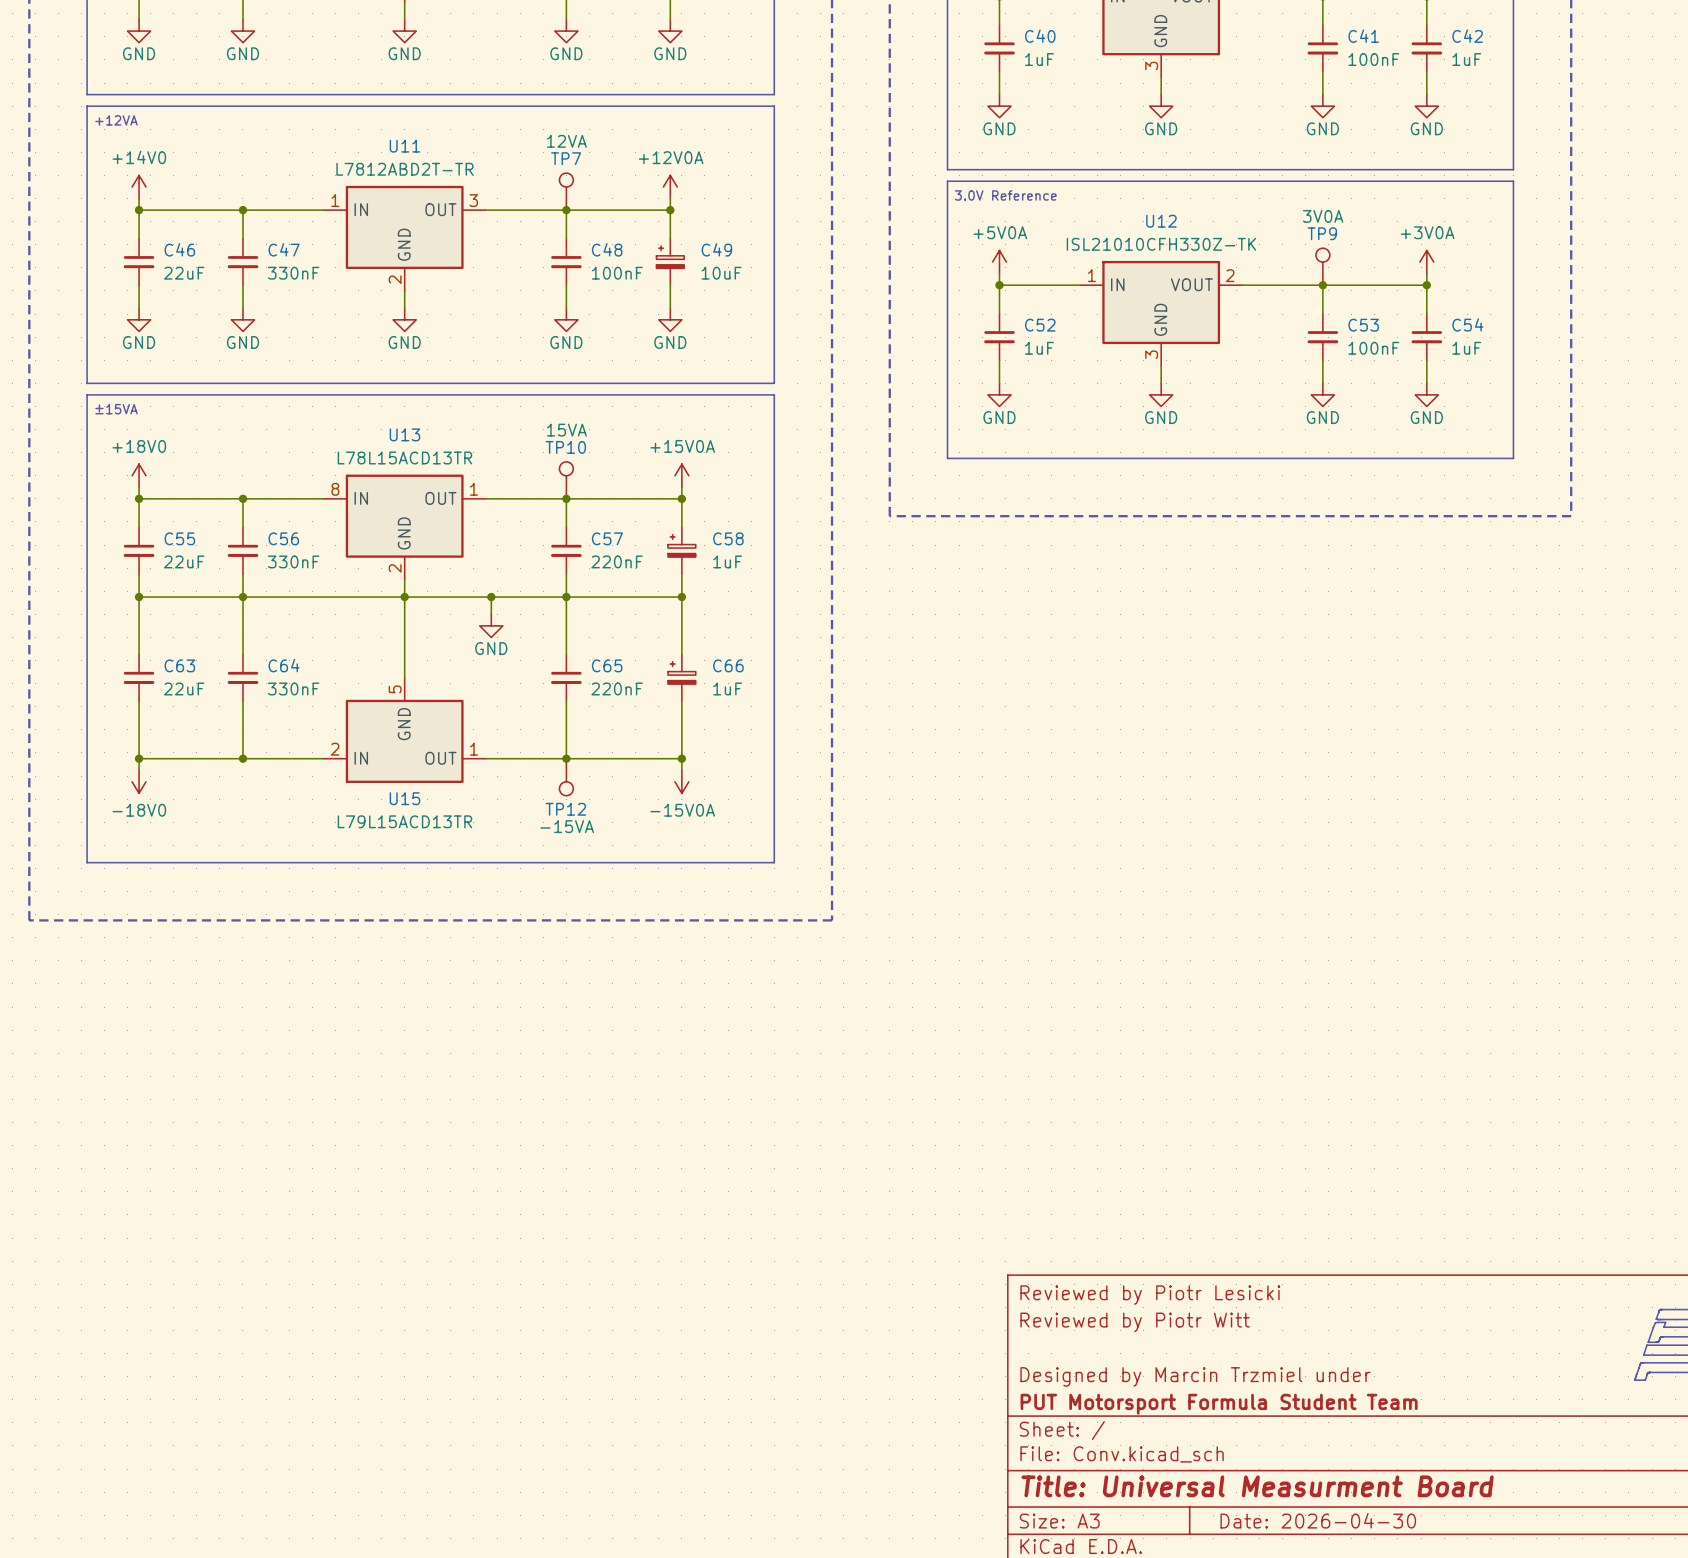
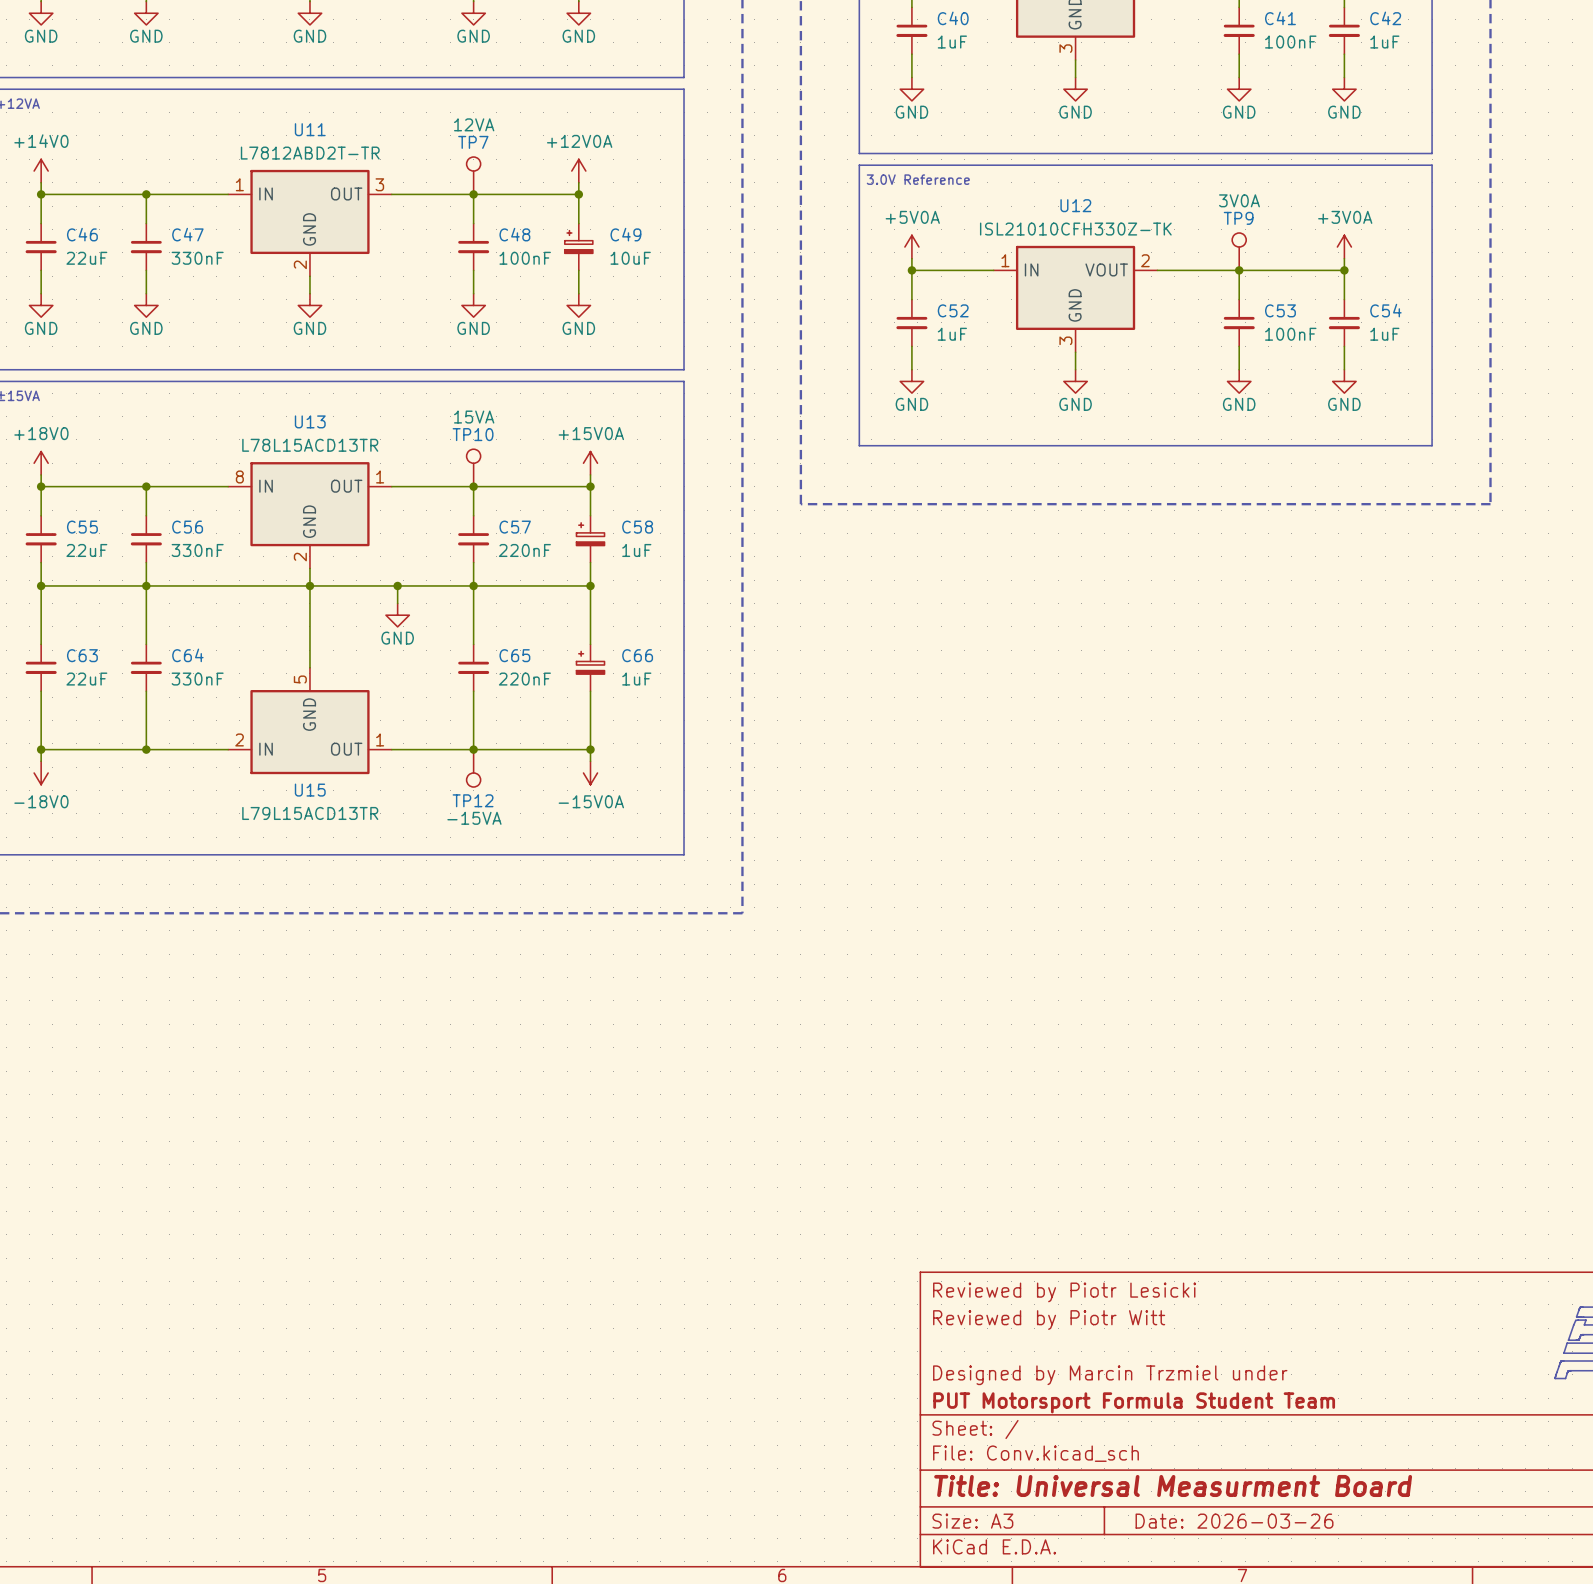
title block: Date: 2026-04-30 (1318, 1520) -> Date: 2026-03-26 (1234, 1521)

